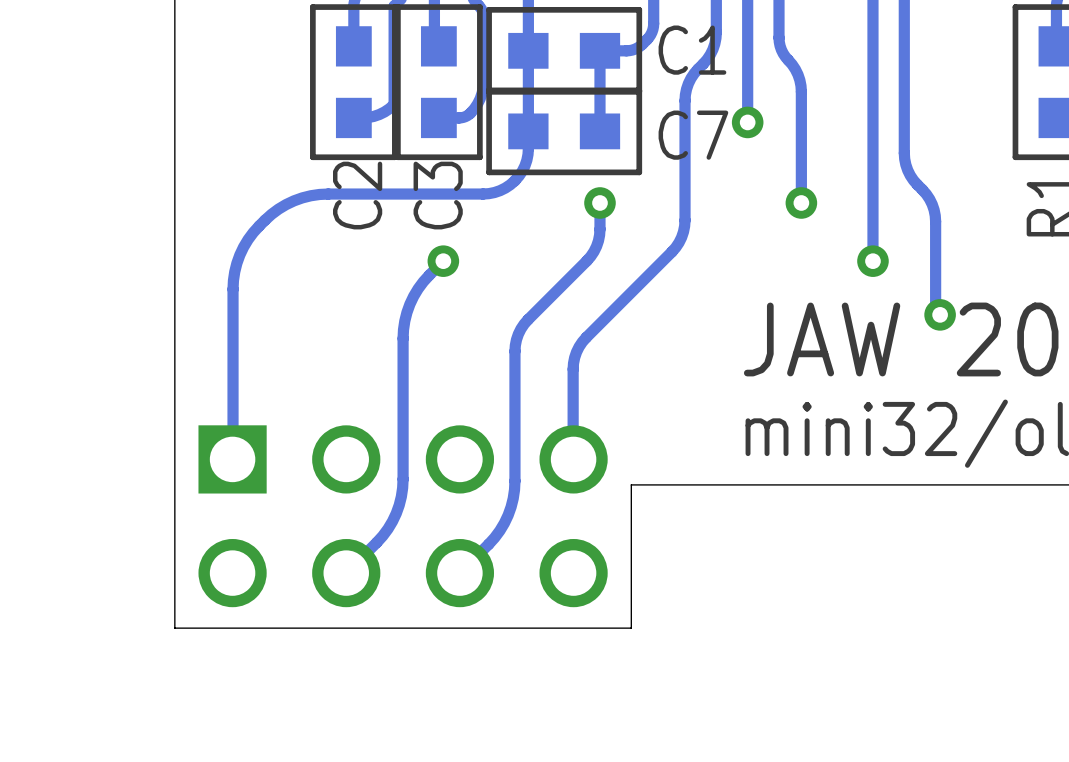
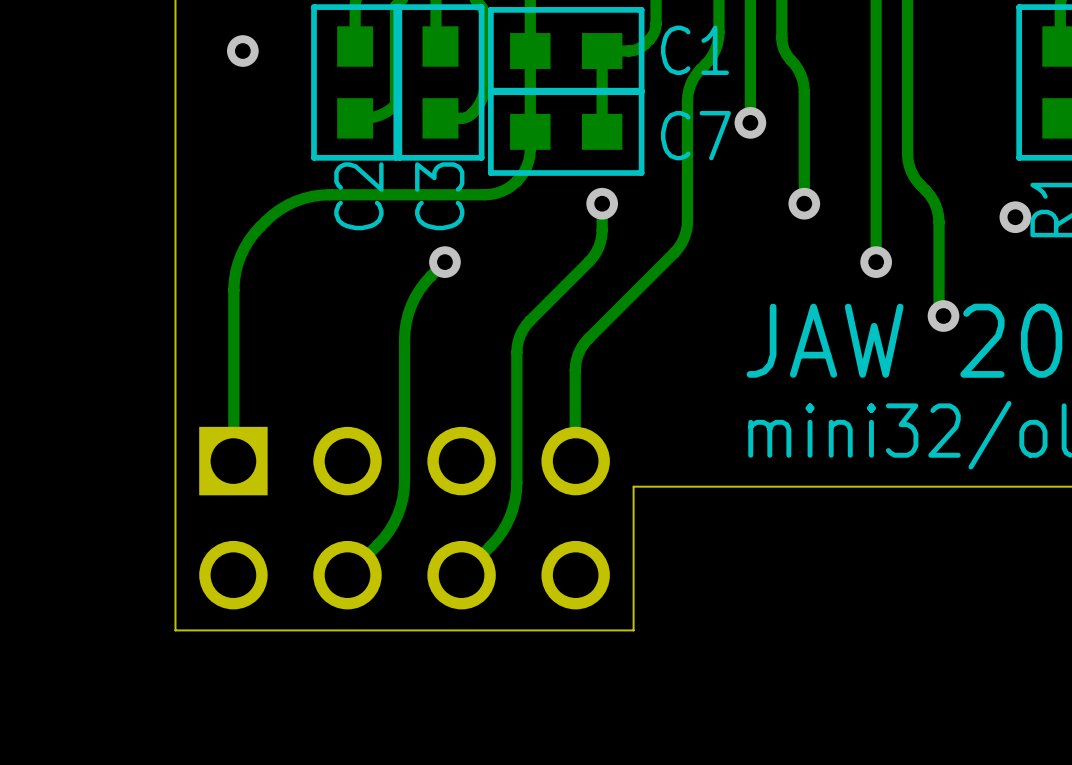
via: none -> (242, 51)
via: none -> (1015, 217)

